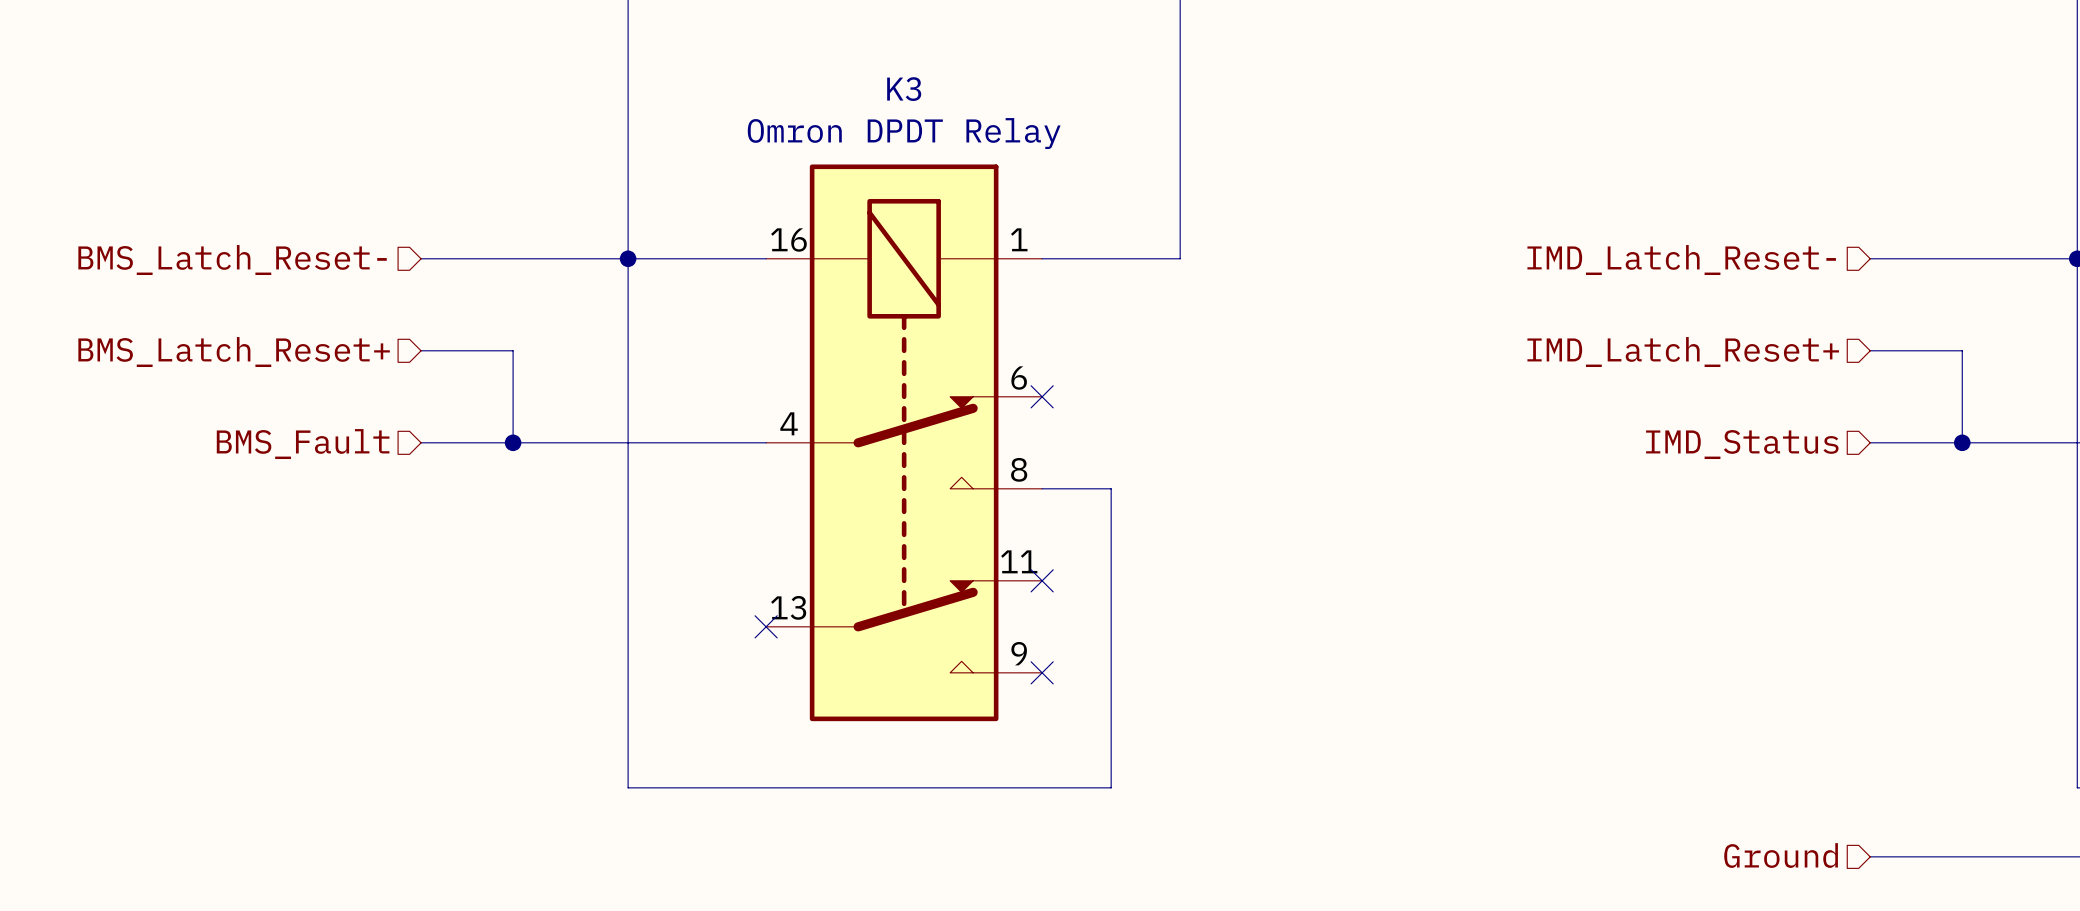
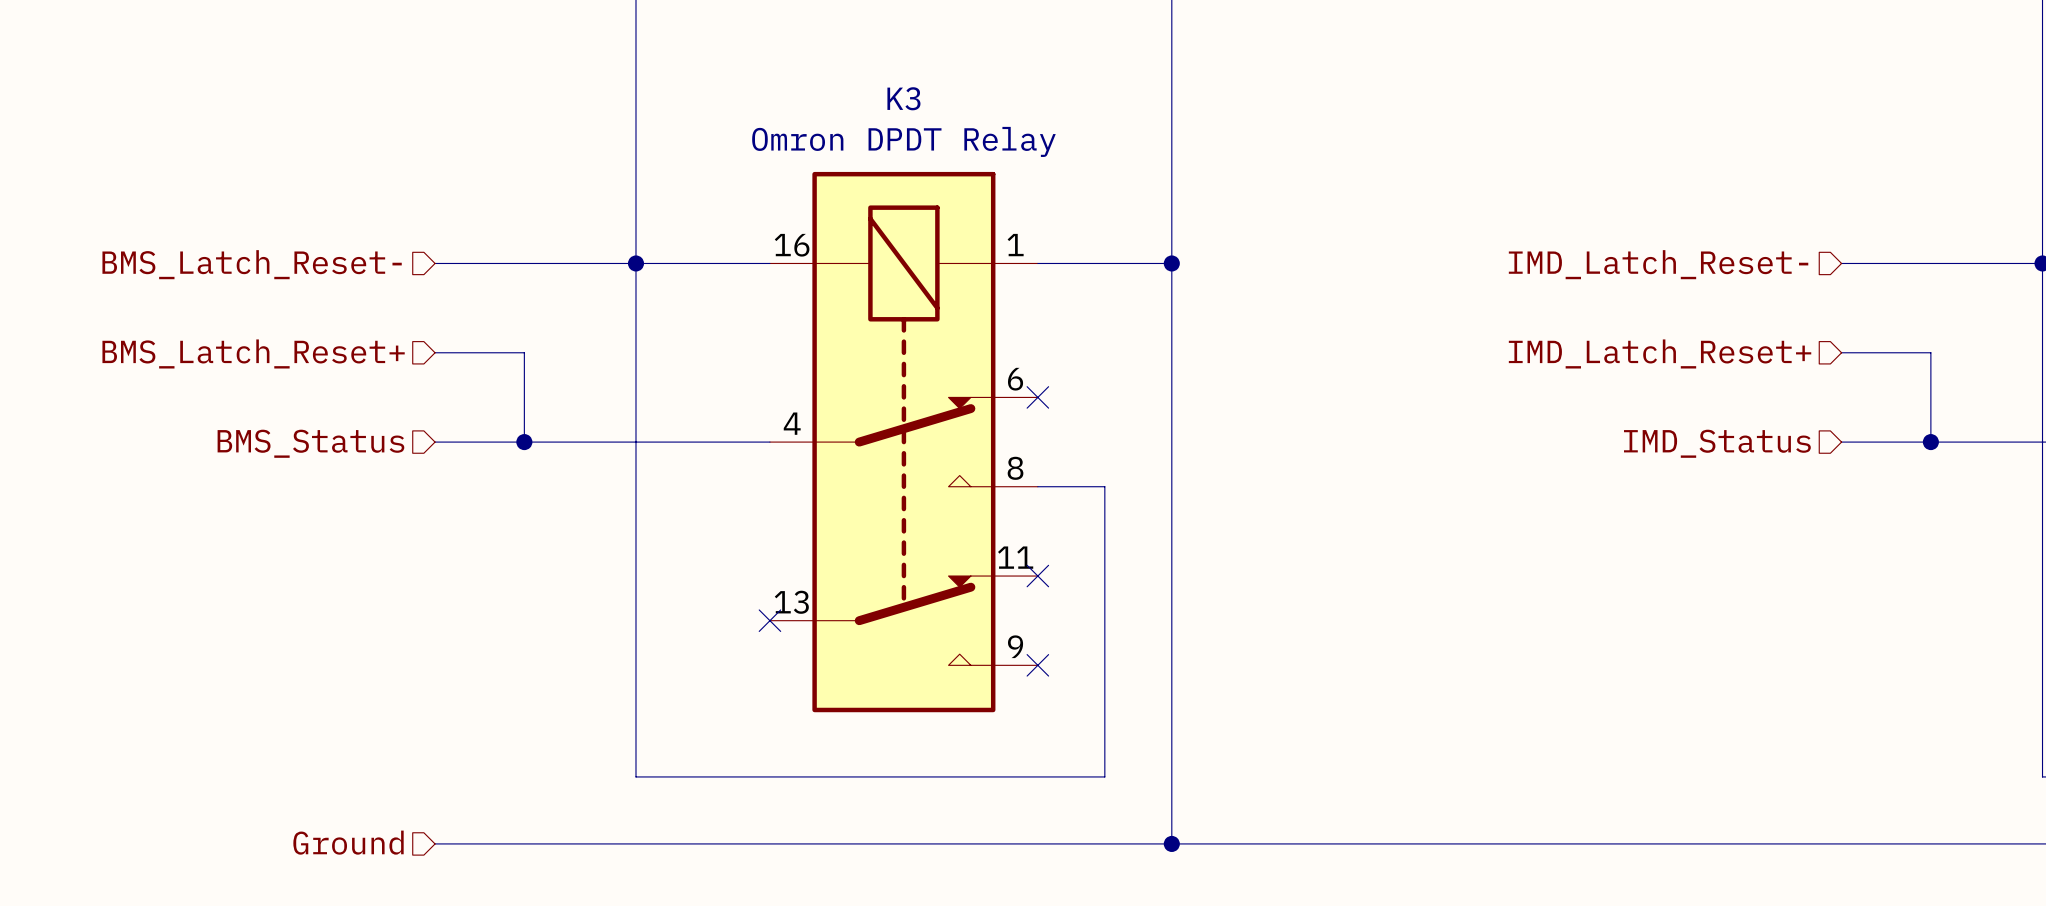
wire: none -> (1171, 263) (1171, 843)
junction: none -> (1171, 263)
hierarchical label: BMS_Fault (303, 444) -> BMS_Status (310, 443)
hierarchical label: none -> Ground (348, 842)
hierarchical label: Ground (1781, 855) -> none
wire: none -> (435, 843) (1841, 843)
junction: none -> (1171, 843)

